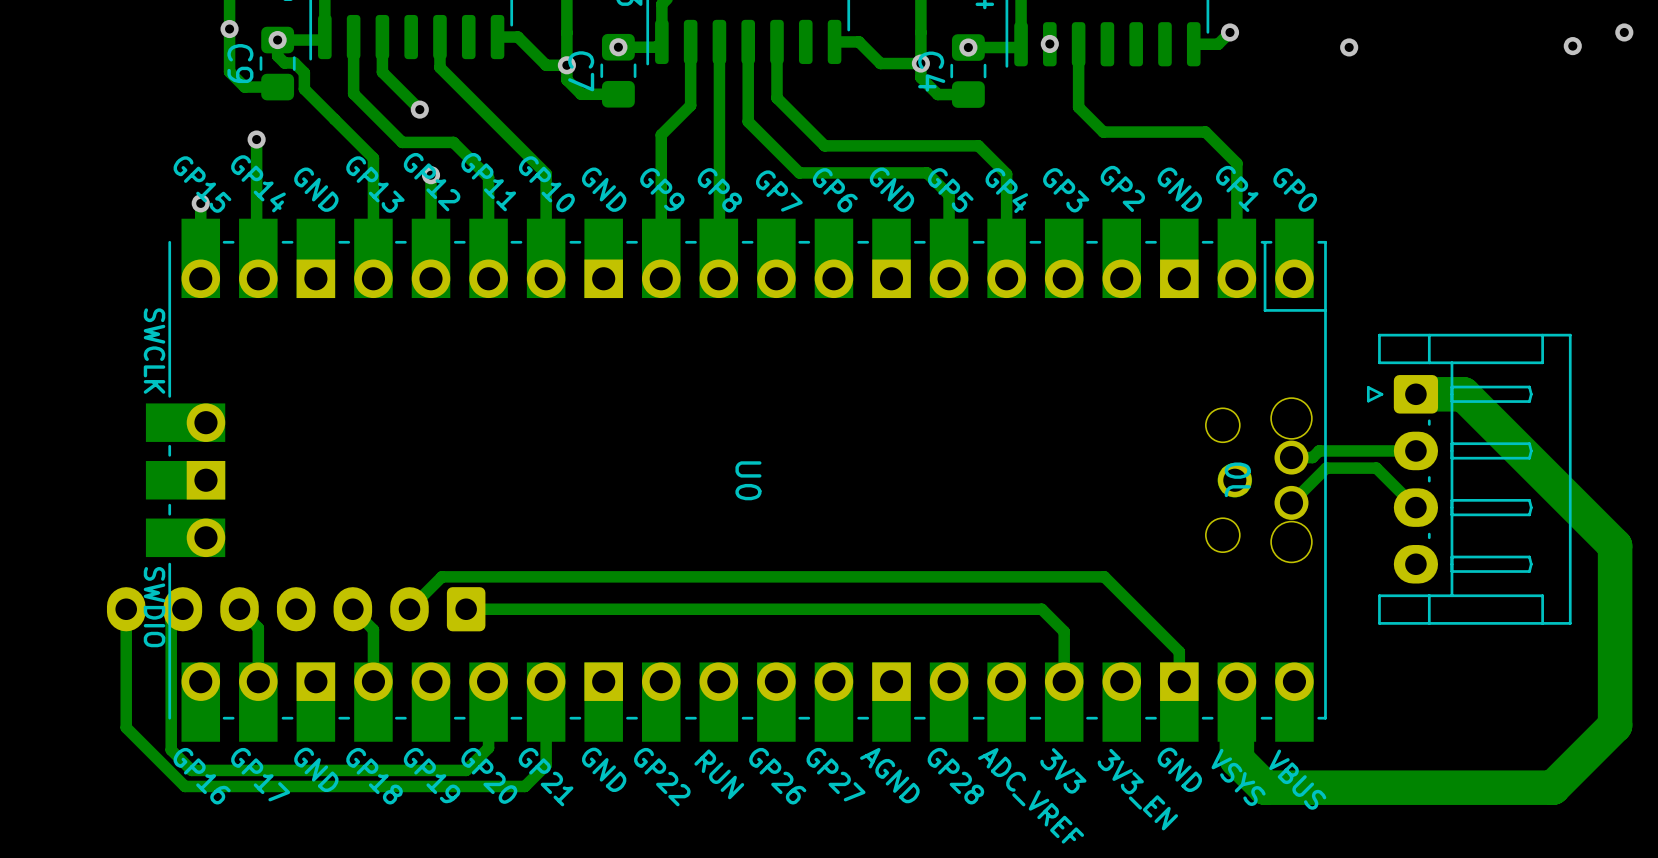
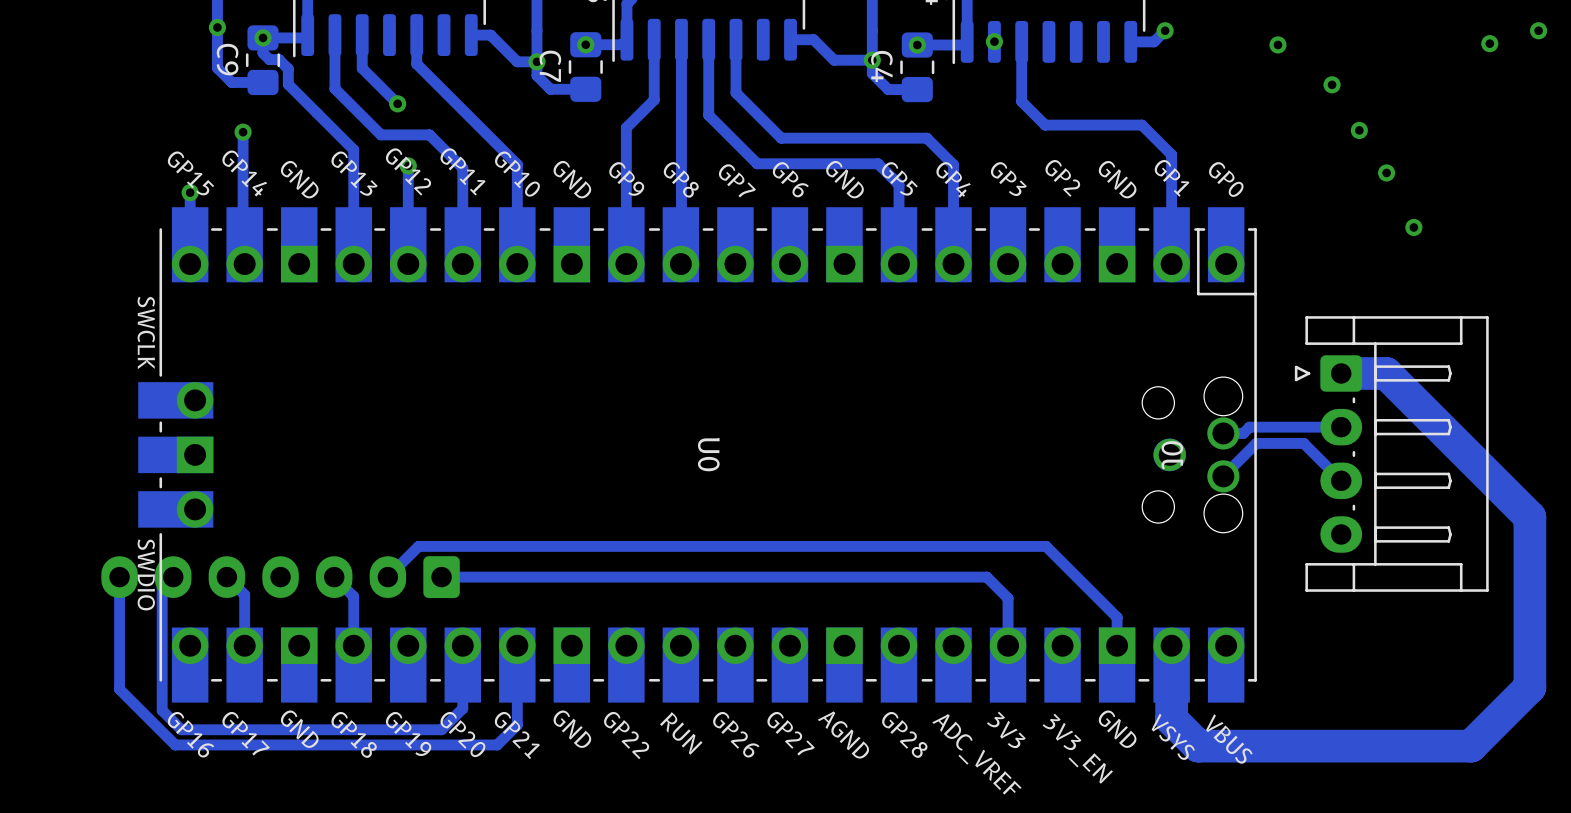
via: none -> (1332, 84)
via: none -> (1359, 130)
via: none -> (1386, 172)
via: none -> (1413, 227)

